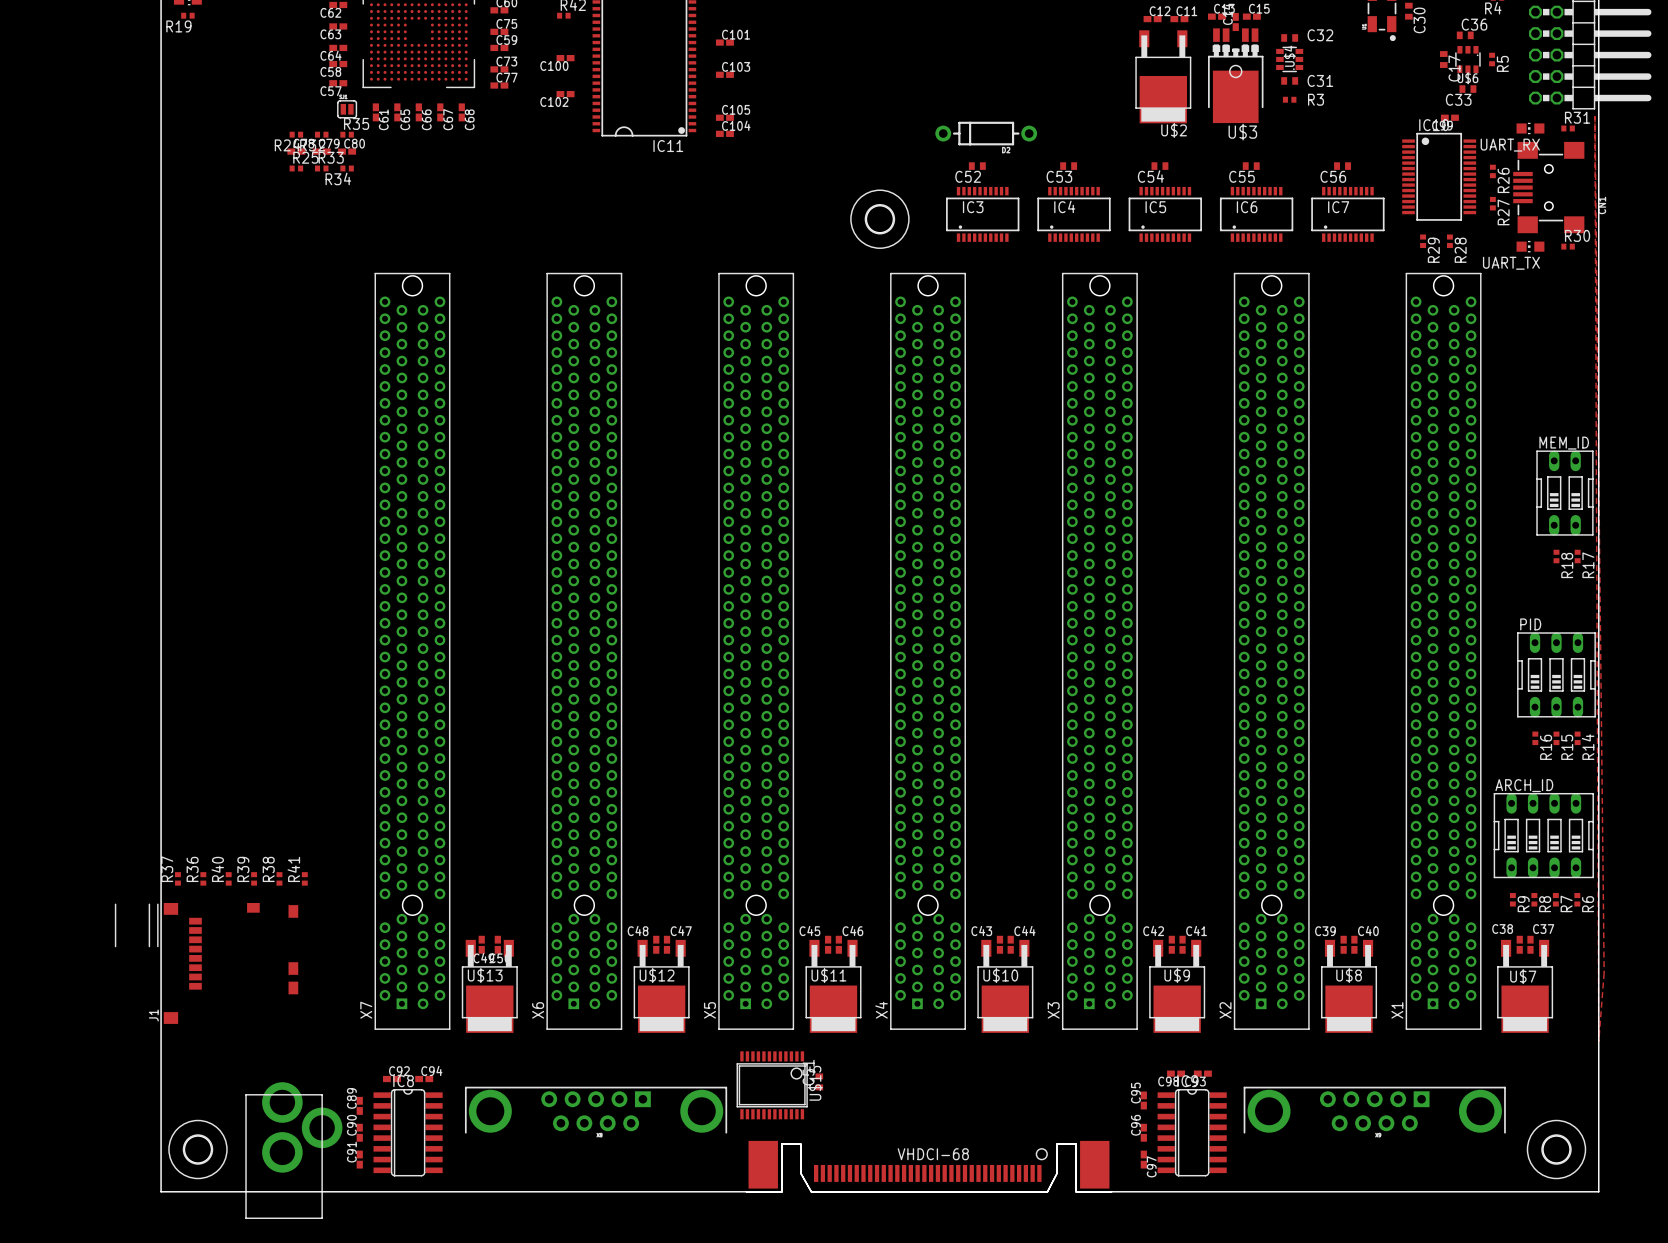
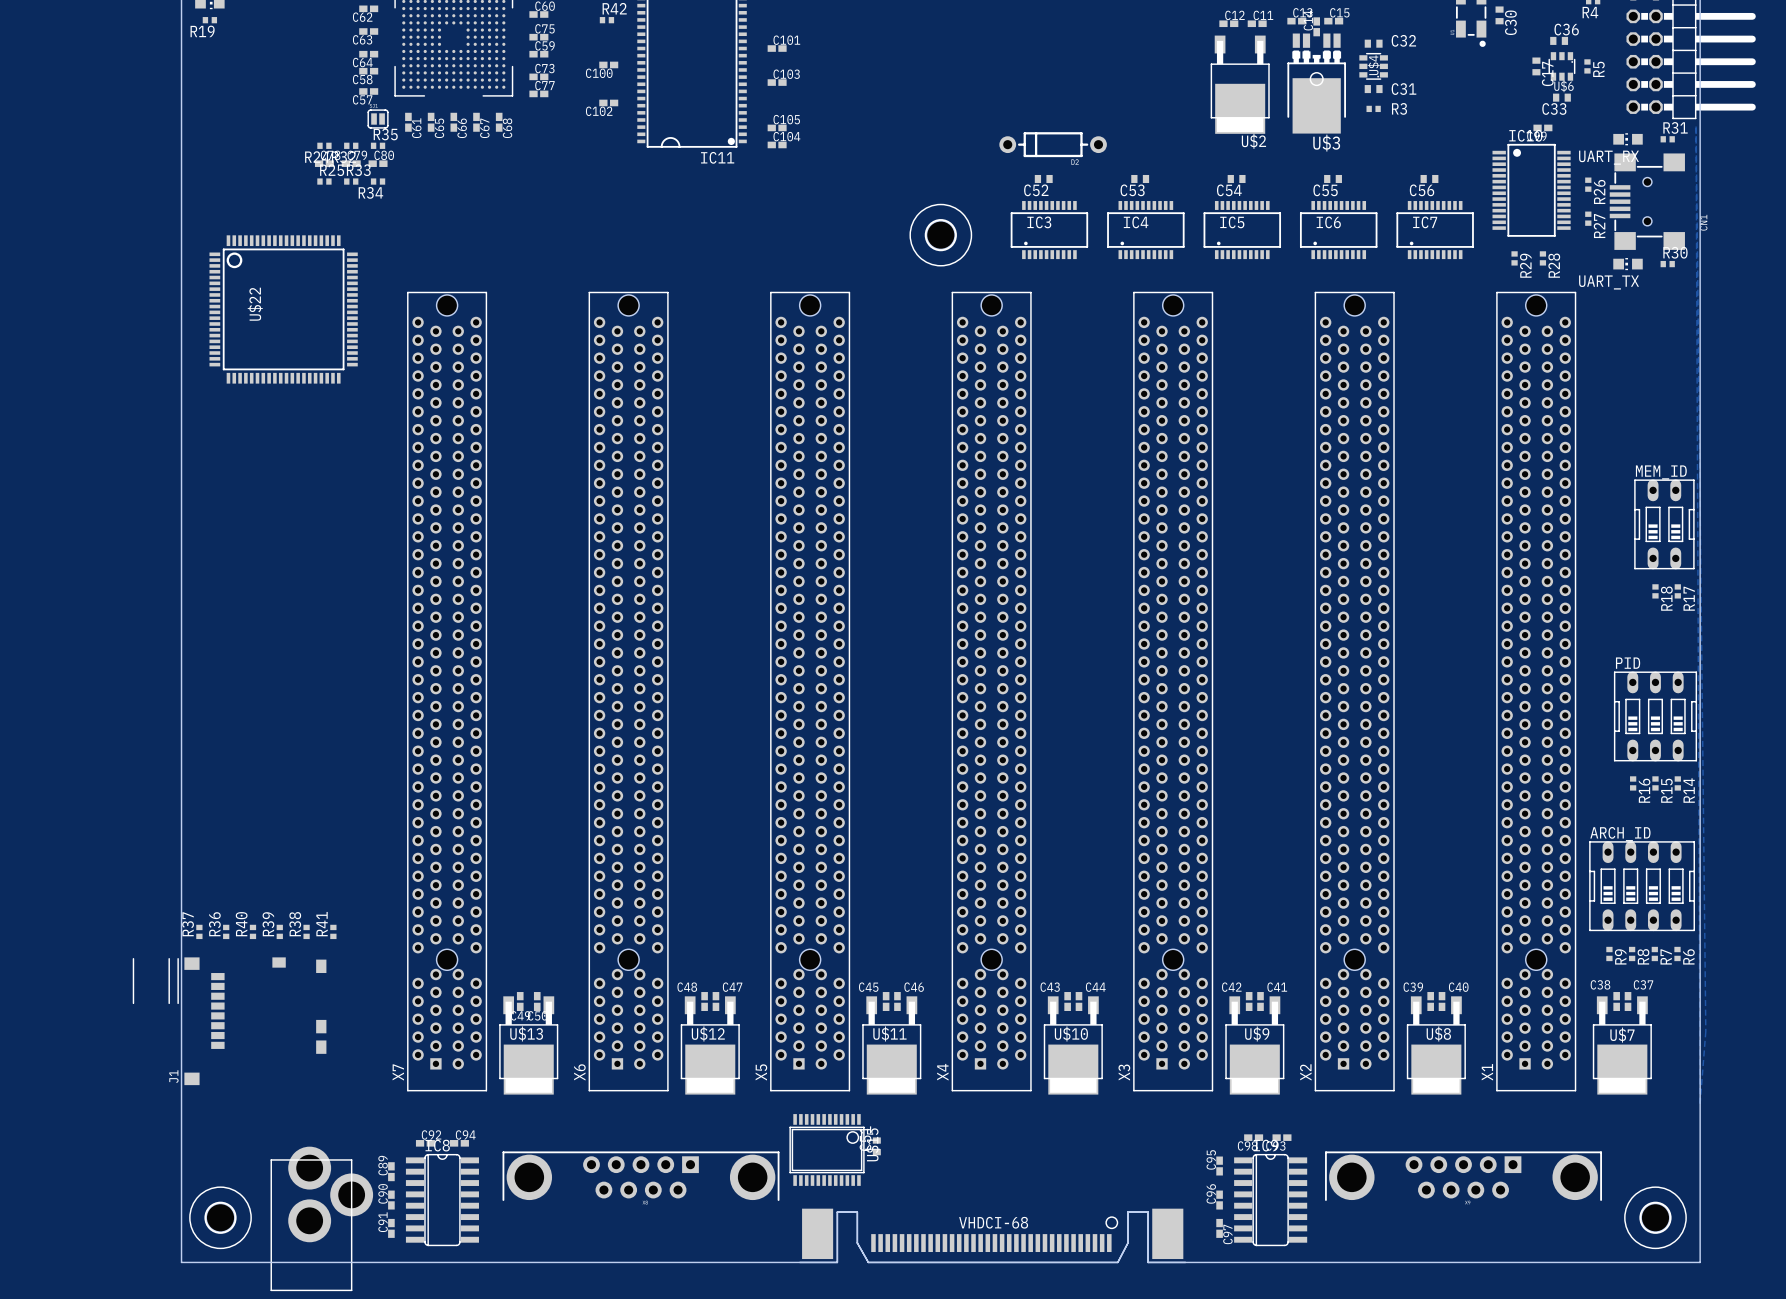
U$22: none -> (283, 309)

